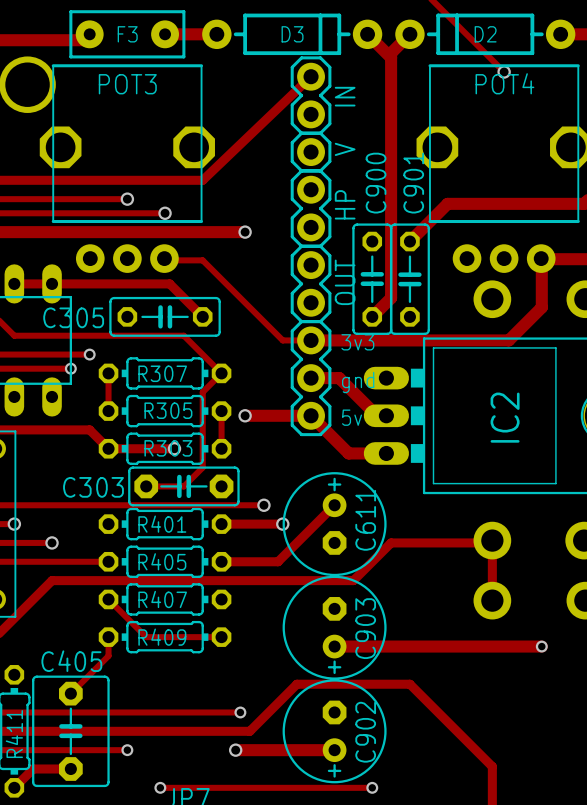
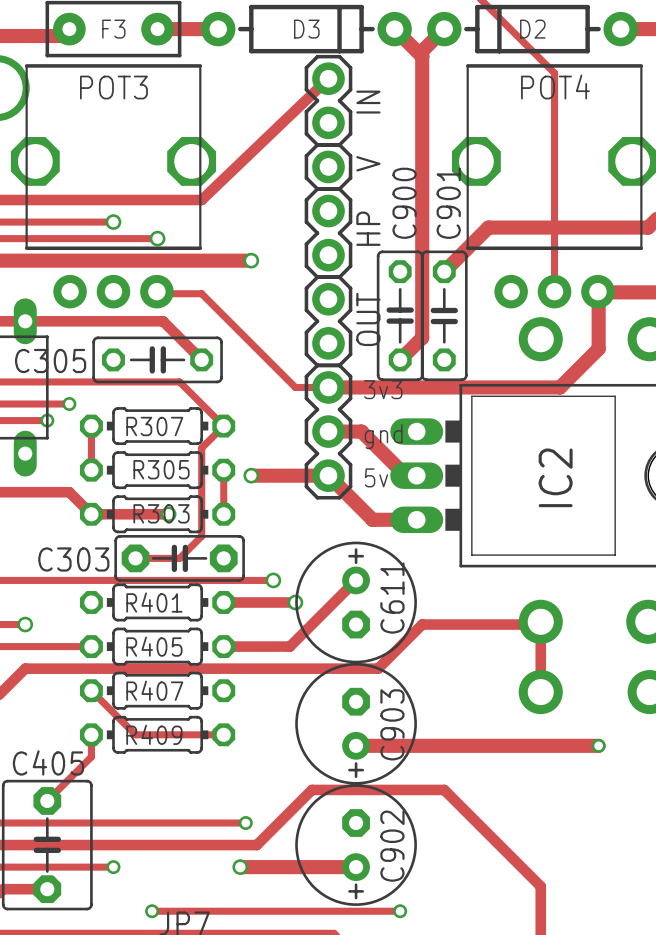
track: none -> (554, 73) (554, 291)
via: (504, 71) -> none

